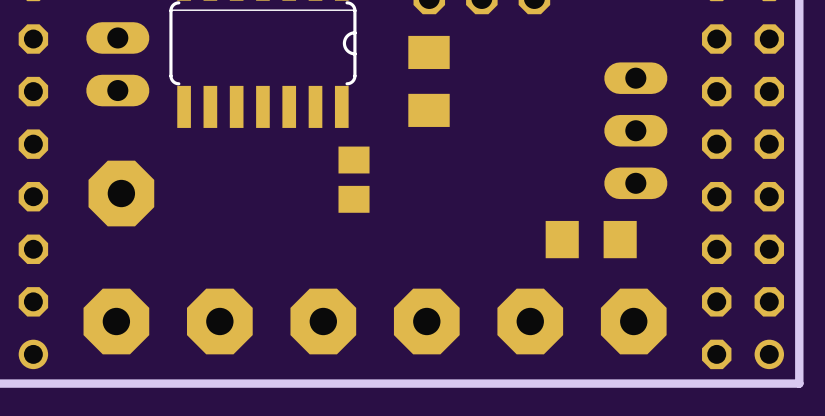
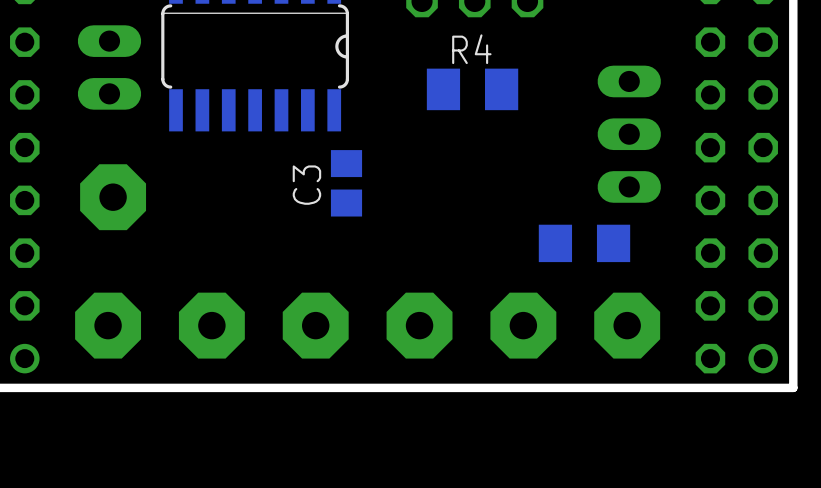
part: (429, 81) -> none
R4: none -> (472, 89)
C3 name: none -> C3 (306, 185)

